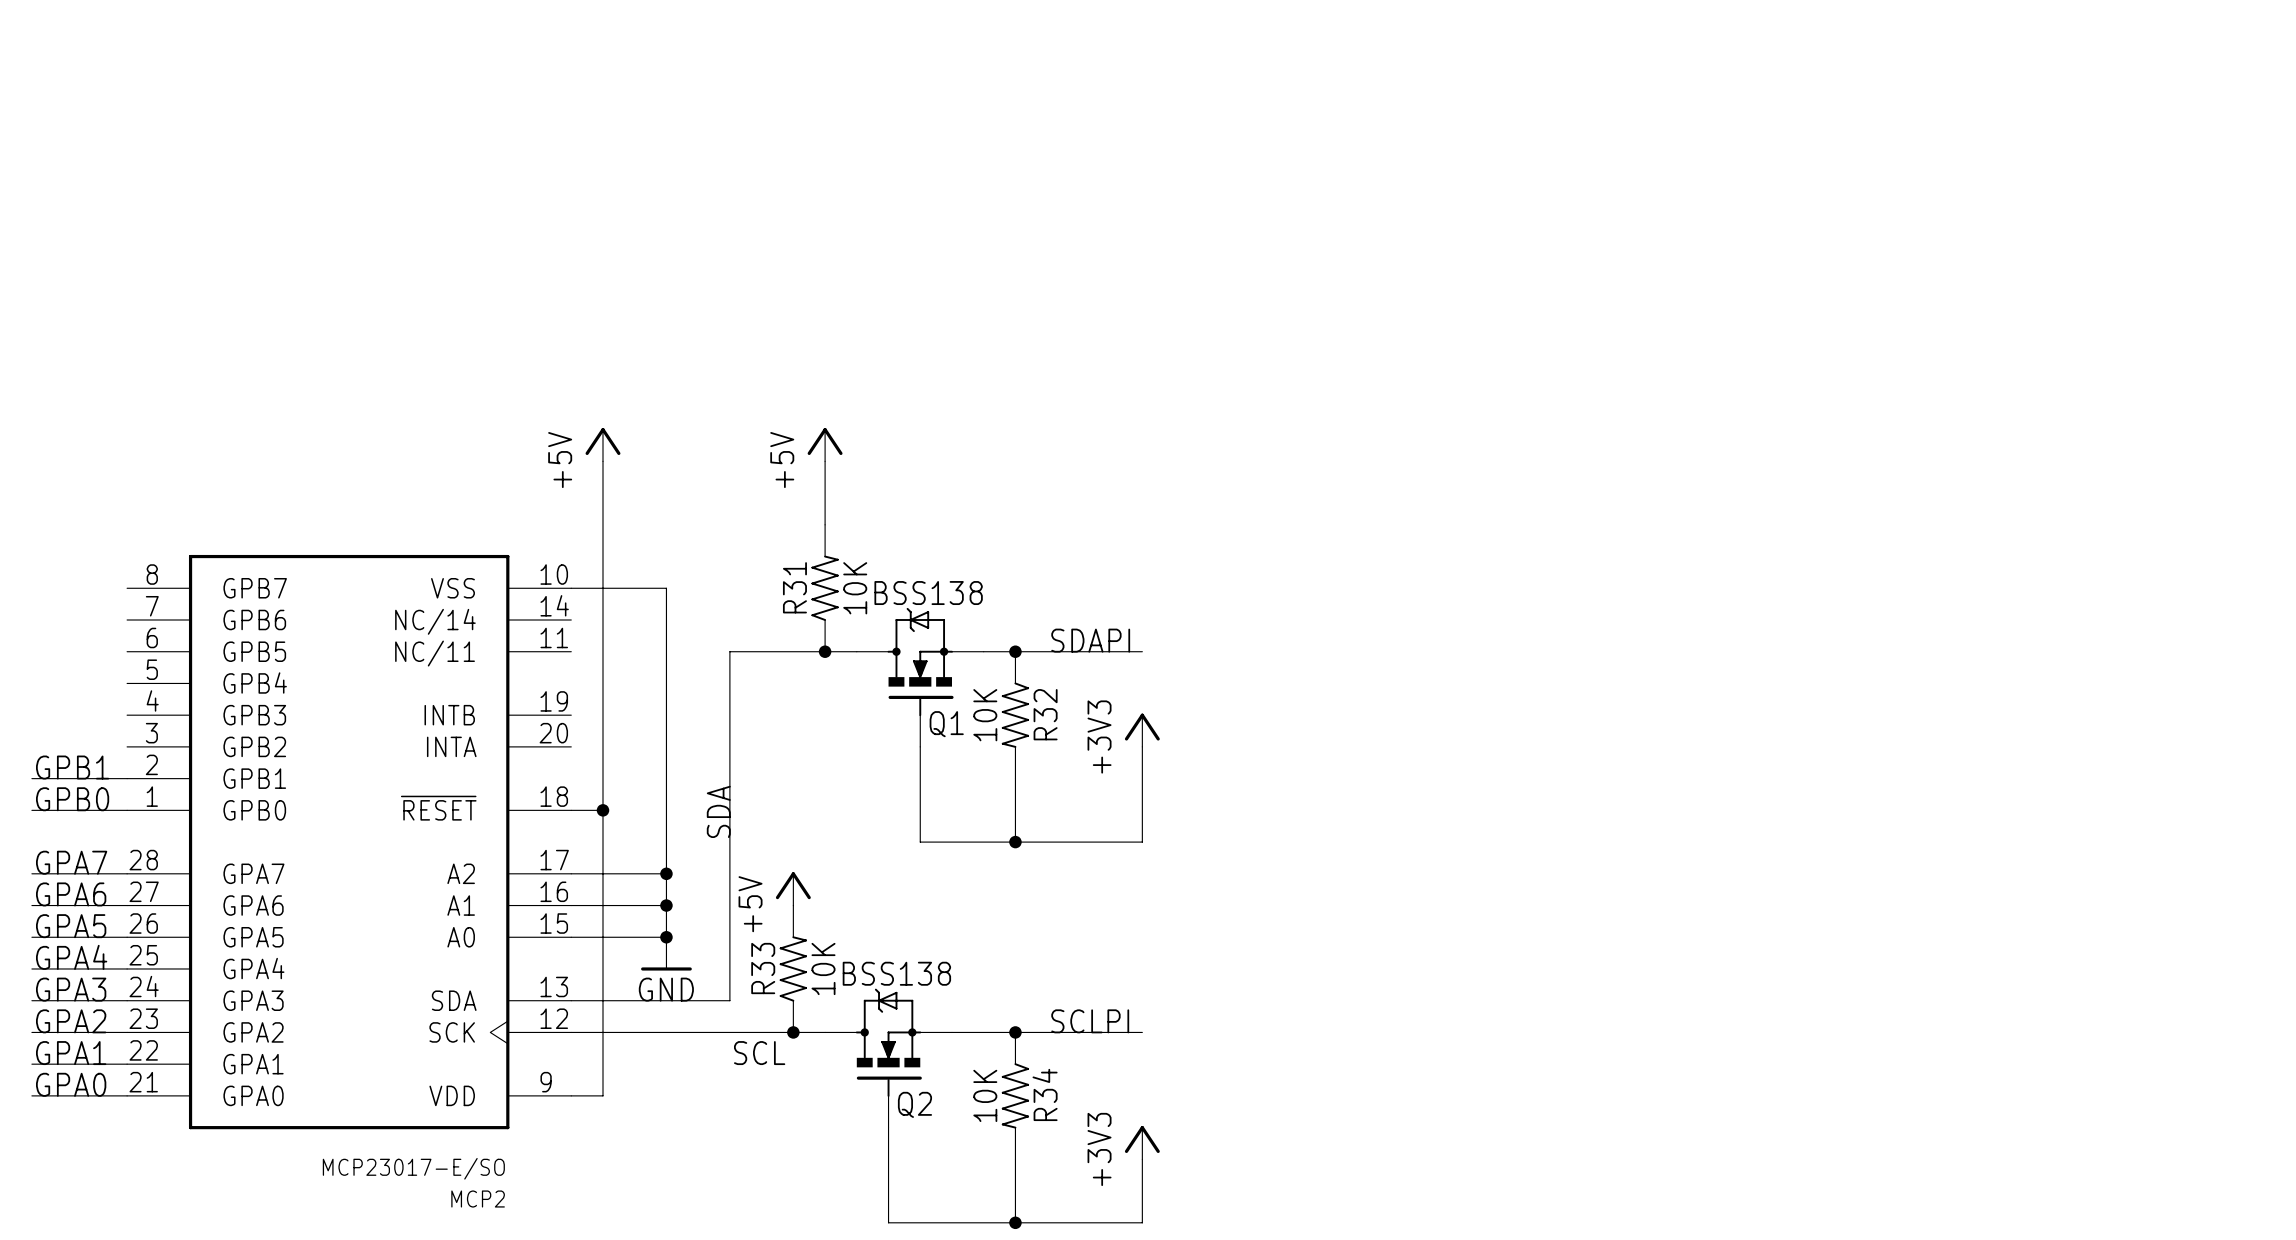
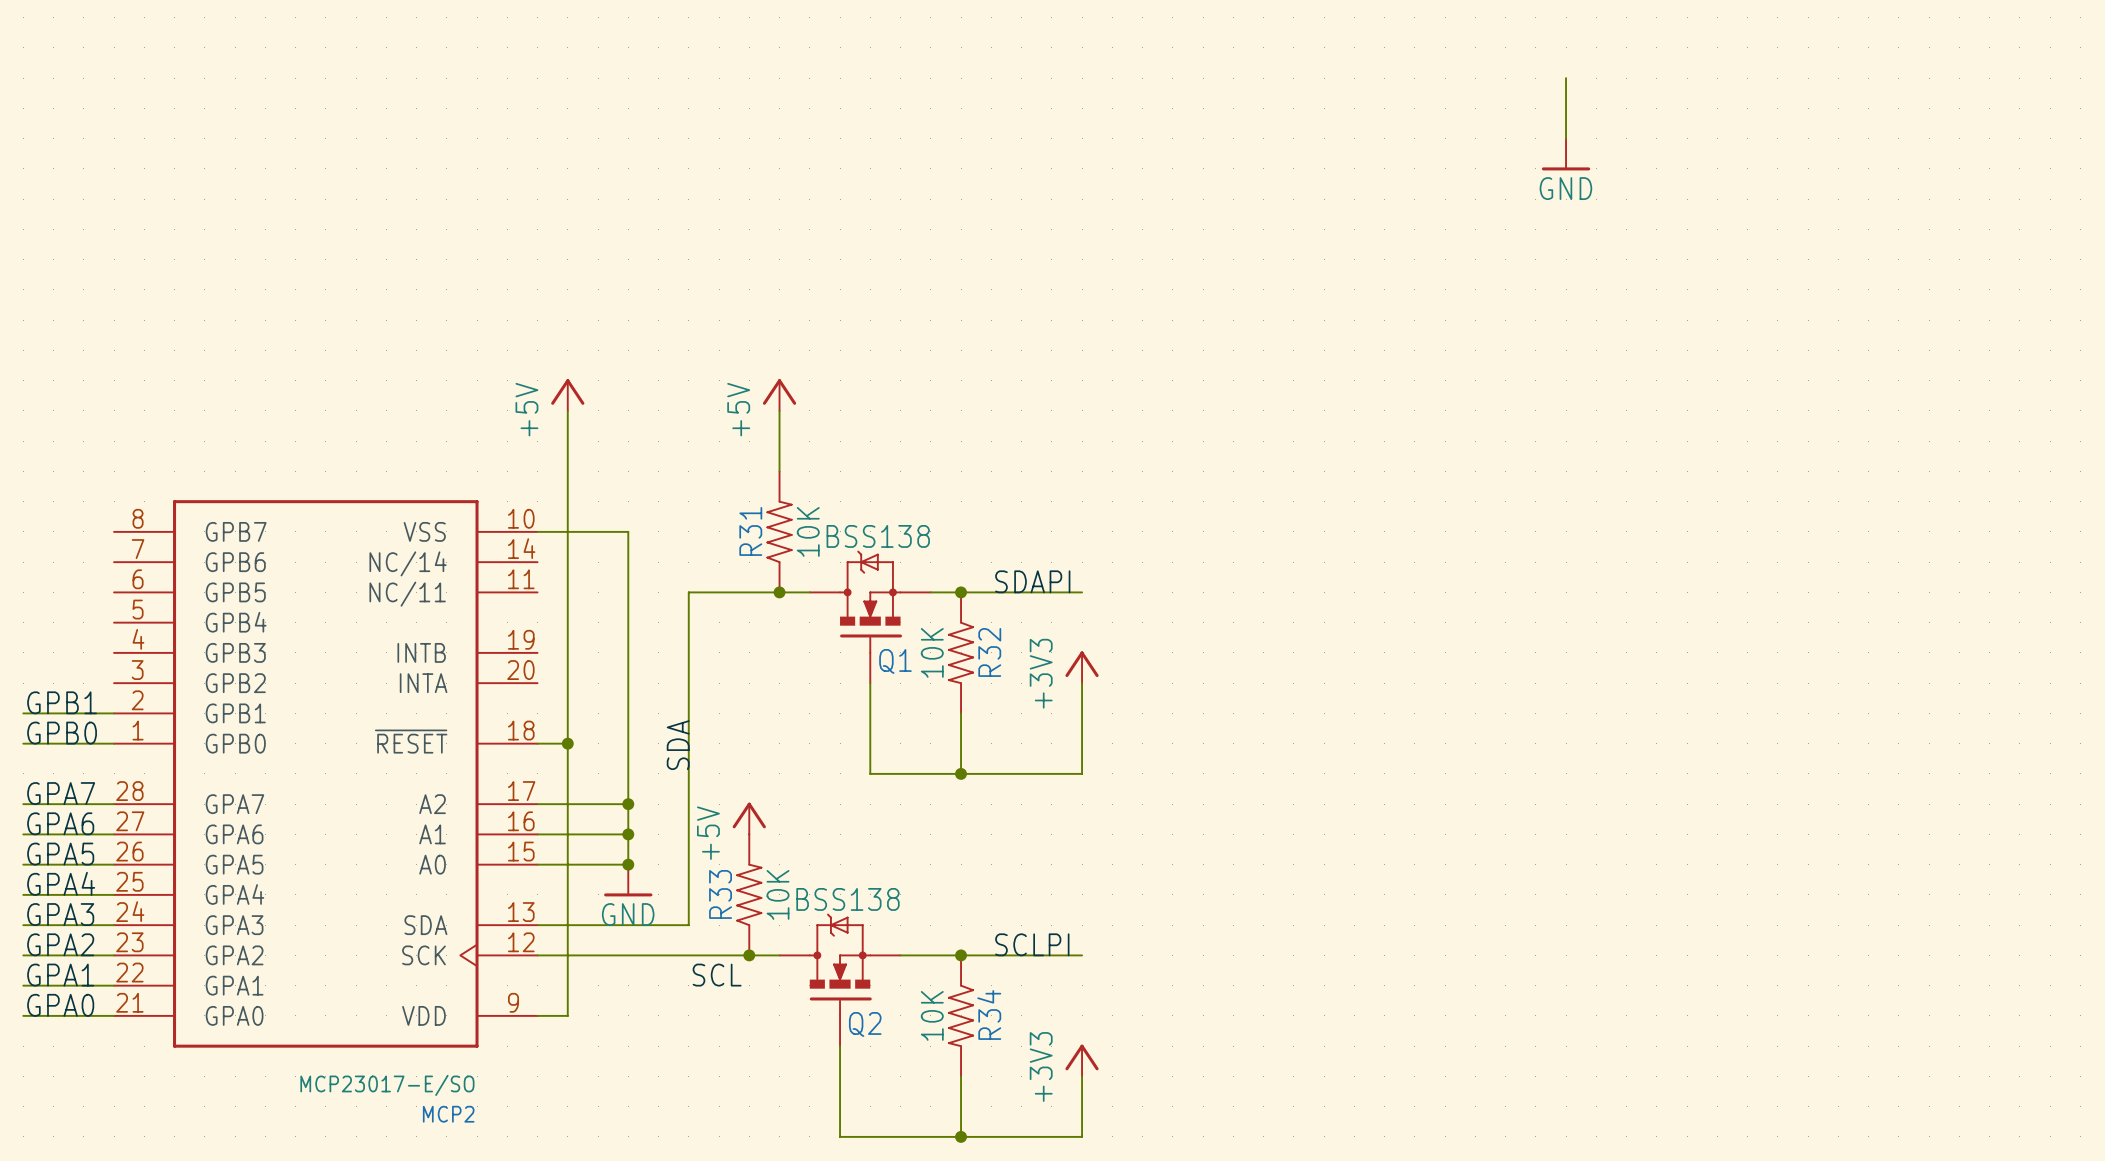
wire: none -> (1566, 78) (1566, 138)
power symbol: none -> GND (1566, 154)

